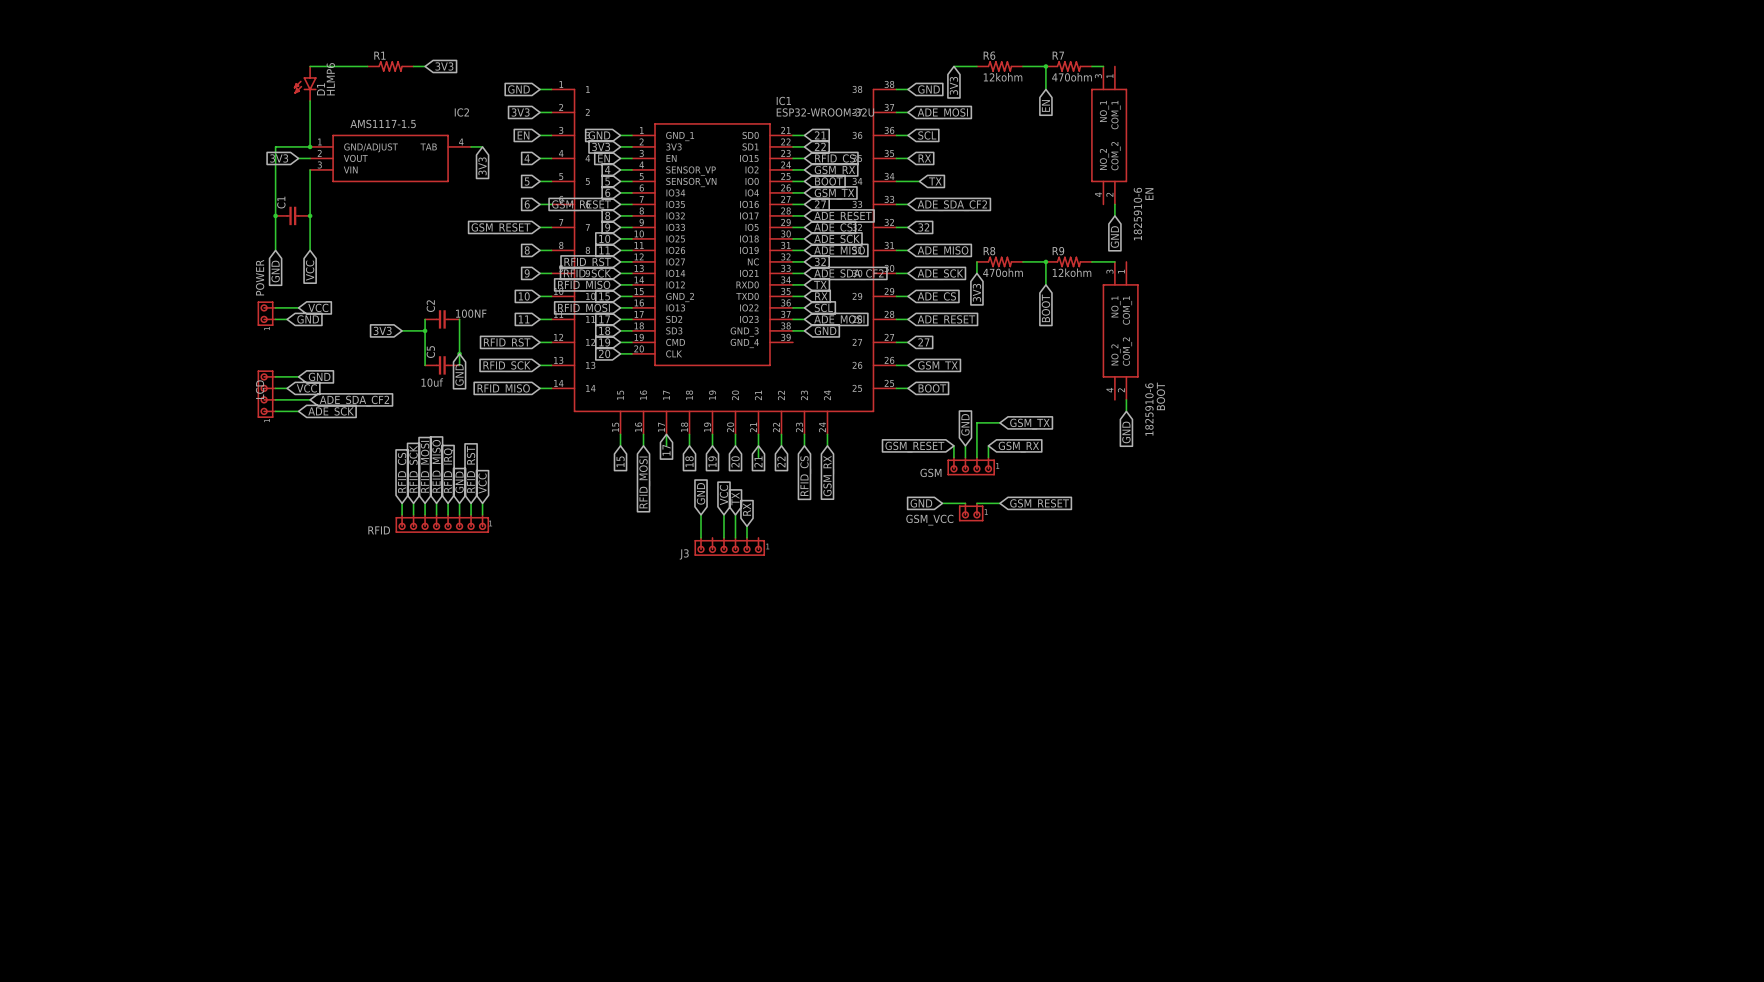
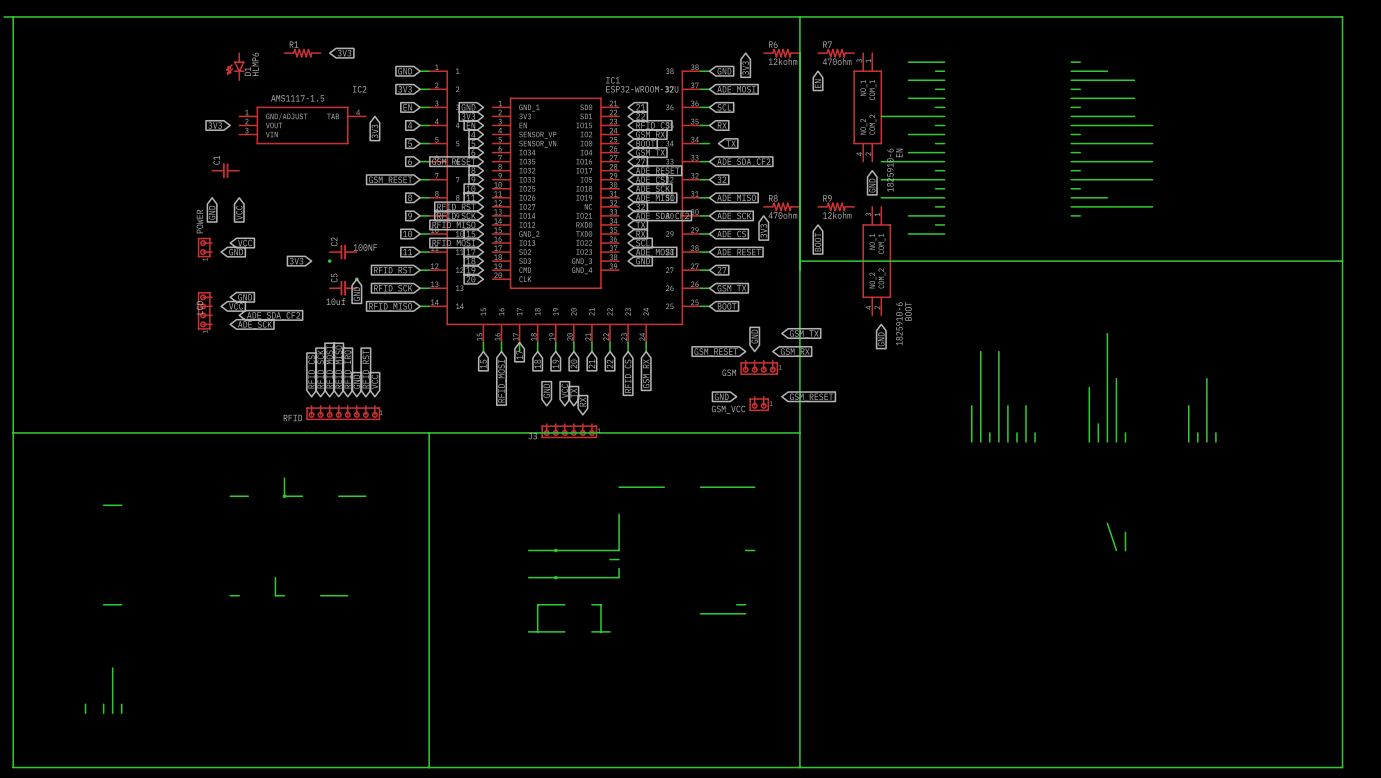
wire: none -> (4, 16) (1342, 16) (1342, 767) (13, 767) (13, 16)
wire: none -> (799, 16) (799, 767)
wire: (310, 66) (367, 66) -> none
wire: (413, 66) (425, 66) -> none
wire: (953, 66) (976, 66) -> none
wire: (1022, 66) (1045, 66) (1045, 89) -> none
junction: (1045, 66) -> none
wire: (1091, 66) (1103, 66) -> (935, 71) (944, 71)
wire: none -> (908, 62) (944, 62)
wire: none -> (1071, 62) (1080, 62)
wire: none -> (1071, 71) (1107, 71)
wire: (310, 100) (310, 146) (275, 146) (275, 250) -> none
wire: none -> (908, 80) (944, 80)
wire: none -> (1071, 80) (1134, 80)
wire: none -> (935, 89) (944, 89)
wire: none -> (1071, 89) (1080, 89)
wire: none -> (908, 98) (944, 98)
wire: none -> (1071, 98) (1134, 98)
wire: (620, 135) (632, 135) -> none
wire: (792, 135) (804, 135) -> none
wire: none -> (935, 107) (944, 107)
wire: none -> (1071, 107) (1080, 107)
junction: (310, 146) -> none
wire: (471, 146) (482, 146) -> none
wire: (620, 146) (632, 146) -> none
wire: (792, 146) (804, 146) -> none
wire: none -> (881, 116) (944, 116)
wire: none -> (1071, 116) (1134, 116)
wire: (298, 158) (310, 158) -> none
wire: (620, 158) (632, 158) -> none
wire: (792, 158) (804, 158) -> none
wire: none -> (935, 125) (944, 125)
wire: none -> (1071, 125) (1152, 125)
wire: (310, 169) (310, 250) -> none
wire: (620, 169) (632, 169) -> none
wire: (792, 169) (804, 169) -> none
wire: none -> (908, 134) (944, 134)
wire: none -> (1071, 134) (1080, 134)
wire: (620, 181) (632, 181) -> none
wire: (792, 181) (804, 181) -> none
wire: (907, 181) (919, 181) -> none
wire: none -> (935, 143) (944, 143)
wire: none -> (1071, 143) (1152, 143)
wire: (620, 192) (632, 192) -> none
wire: (792, 192) (804, 192) -> none
wire: none -> (908, 152) (944, 152)
wire: none -> (1071, 152) (1080, 152)
wire: (620, 204) (632, 204) -> none
wire: (792, 204) (804, 204) -> none
wire: (1114, 204) (1114, 215) -> none
wire: none -> (881, 161) (944, 161)
wire: none -> (1071, 161) (1152, 161)
junction: (275, 215) -> none
junction: (310, 215) -> none
wire: (620, 215) (632, 215) -> none
wire: (792, 215) (804, 215) -> none
wire: none -> (935, 170) (944, 170)
wire: none -> (1071, 170) (1080, 170)
wire: (620, 227) (632, 227) -> none
wire: (792, 227) (804, 227) -> none
wire: none -> (881, 179) (944, 179)
wire: none -> (1071, 179) (1152, 179)
wire: (620, 238) (632, 238) -> none
wire: (792, 238) (804, 238) -> none
wire: none -> (935, 188) (944, 188)
wire: none -> (1071, 188) (1080, 188)
wire: (620, 250) (632, 250) -> none
wire: (792, 250) (804, 250) -> none
wire: none -> (881, 197) (944, 197)
wire: none -> (1071, 197) (1107, 197)
wire: (620, 261) (632, 261) -> none
wire: (792, 261) (804, 261) -> none
wire: (976, 261) (976, 273) -> none
wire: (1022, 261) (1045, 261) (1045, 284) -> none
junction: (1045, 261) -> none
wire: (1091, 261) (1114, 261) -> none
wire: none -> (935, 206) (944, 206)
wire: none -> (1071, 206) (1152, 206)
wire: (620, 273) (632, 273) -> none
wire: (792, 273) (804, 273) -> none
wire: none -> (908, 215) (944, 215)
wire: none -> (1071, 215) (1080, 215)
wire: (620, 284) (632, 284) -> none
wire: (792, 284) (804, 284) -> none
wire: none -> (935, 224) (944, 224)
wire: (620, 296) (632, 296) -> none
wire: (792, 296) (804, 296) -> none
wire: none -> (908, 233) (944, 233)
wire: (275, 307) (298, 307) -> none
wire: (620, 307) (632, 307) -> none
wire: (792, 307) (804, 307) -> none
wire: (275, 319) (287, 319) -> none
wire: (425, 319) (425, 365) -> none
wire: (459, 319) (459, 365) -> none
wire: (620, 319) (632, 319) -> none
wire: (792, 319) (804, 319) -> none
wire: (402, 330) (425, 330) -> none
wire: (620, 330) (632, 330) -> none
wire: (792, 330) (804, 330) -> none
wire: none -> (799, 261) (1342, 261)
wire: (620, 342) (632, 342) -> none
wire: (620, 353) (632, 353) -> none
wire: (275, 376) (298, 376) -> none
wire: (275, 388) (287, 388) -> none
wire: (275, 399) (310, 399) -> none
wire: (1126, 399) (1126, 411) -> none
wire: (275, 411) (298, 411) -> none
wire: (999, 422) (976, 422) (976, 457) -> none
wire: none -> (1107, 333) (1107, 441)
wire: (758, 445) (758, 457) -> none
wire: (953, 445) (953, 457) -> none
wire: (965, 445) (965, 457) -> none
wire: (988, 445) (988, 457) -> none
wire: none -> (980, 351) (980, 441)
wire: none -> (998, 351) (998, 441)
wire: none -> (1116, 378) (1116, 441)
wire: none -> (1206, 378) (1206, 441)
wire: none -> (1089, 387) (1089, 441)
wire: (402, 503) (402, 514) -> none
wire: (413, 503) (413, 514) -> none
wire: (425, 503) (425, 514) -> none
wire: (436, 503) (436, 514) -> none
wire: (448, 503) (448, 514) -> none
wire: (459, 503) (459, 514) -> none
wire: (471, 503) (471, 514) -> none
wire: (482, 503) (482, 514) -> none
wire: (942, 503) (965, 503) -> none
wire: (976, 503) (999, 503) -> none
wire: (701, 514) (701, 537) -> none
wire: (724, 514) (724, 537) -> none
wire: (735, 514) (735, 537) -> none
wire: none -> (971, 405) (971, 441)
wire: none -> (1007, 405) (1007, 441)
wire: none -> (1026, 405) (1026, 441)
wire: none -> (1188, 405) (1188, 441)
wire: (746, 526) (746, 537) -> none
wire: none -> (1098, 423) (1098, 441)
wire: none -> (13, 432) (799, 432)
wire: none -> (429, 432) (429, 767)
wire: none -> (989, 432) (989, 441)
wire: none -> (1016, 432) (1016, 441)
wire: none -> (1035, 432) (1035, 441)
wire: none -> (1125, 432) (1125, 441)
wire: none -> (1197, 432) (1197, 441)
wire: none -> (1215, 432) (1215, 441)
wire: none -> (284, 478) (284, 496) (302, 496)
wire: none -> (619, 487) (664, 487)
wire: none -> (700, 487) (754, 487)
wire: none -> (230, 496) (248, 496)
junction: none -> (284, 496)
wire: none -> (338, 496) (365, 496)
wire: none -> (103, 505) (121, 505)
wire: none -> (619, 514) (619, 550) (528, 550)
wire: none -> (1107, 523) (1116, 550)
wire: none -> (1125, 532) (1125, 550)
junction: none -> (555, 550)
wire: none -> (745, 550) (754, 550)
wire: none -> (610, 559) (619, 559)
wire: none -> (619, 568) (619, 577) (528, 577)
wire: none -> (275, 577) (275, 595) (284, 595)
junction: none -> (555, 577)
wire: none -> (230, 595) (239, 595)
wire: none -> (320, 595) (347, 595)
wire: none -> (103, 604) (121, 604)
wire: none -> (564, 604) (537, 604) (537, 631)
wire: none -> (591, 604) (600, 604) (600, 631)
wire: none -> (736, 604) (745, 604)
wire: none -> (700, 613) (745, 613)
wire: none -> (528, 631) (564, 631)
wire: none -> (591, 631) (610, 631)
wire: none -> (112, 668) (112, 713)
wire: none -> (85, 704) (85, 713)
wire: none -> (103, 704) (103, 713)
wire: none -> (121, 704) (121, 713)

